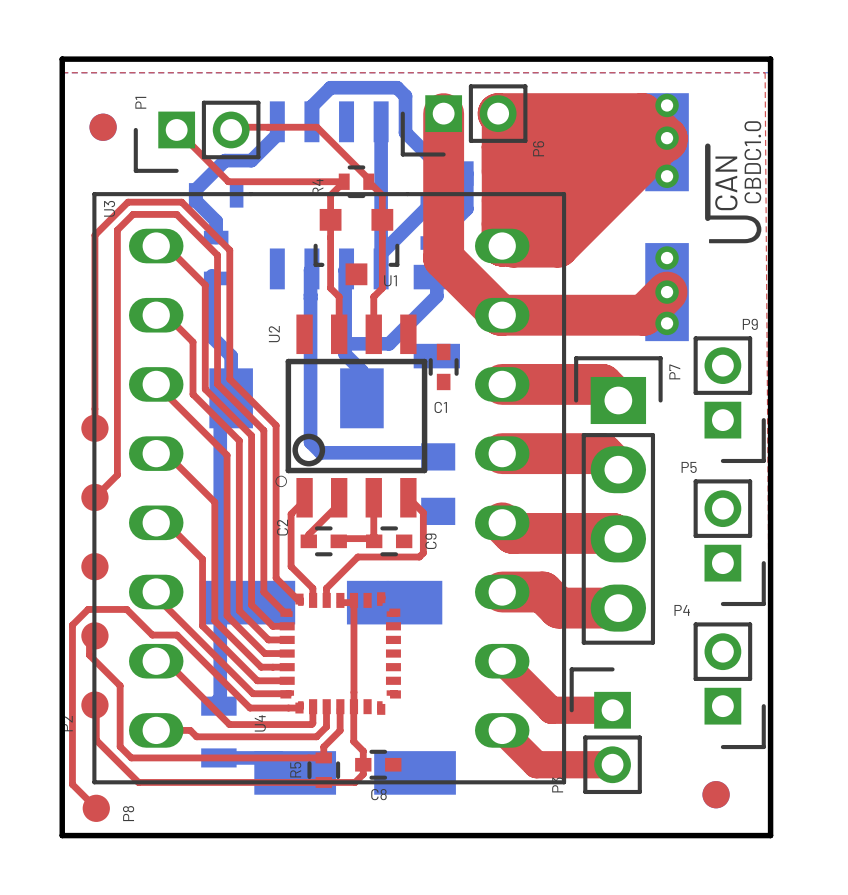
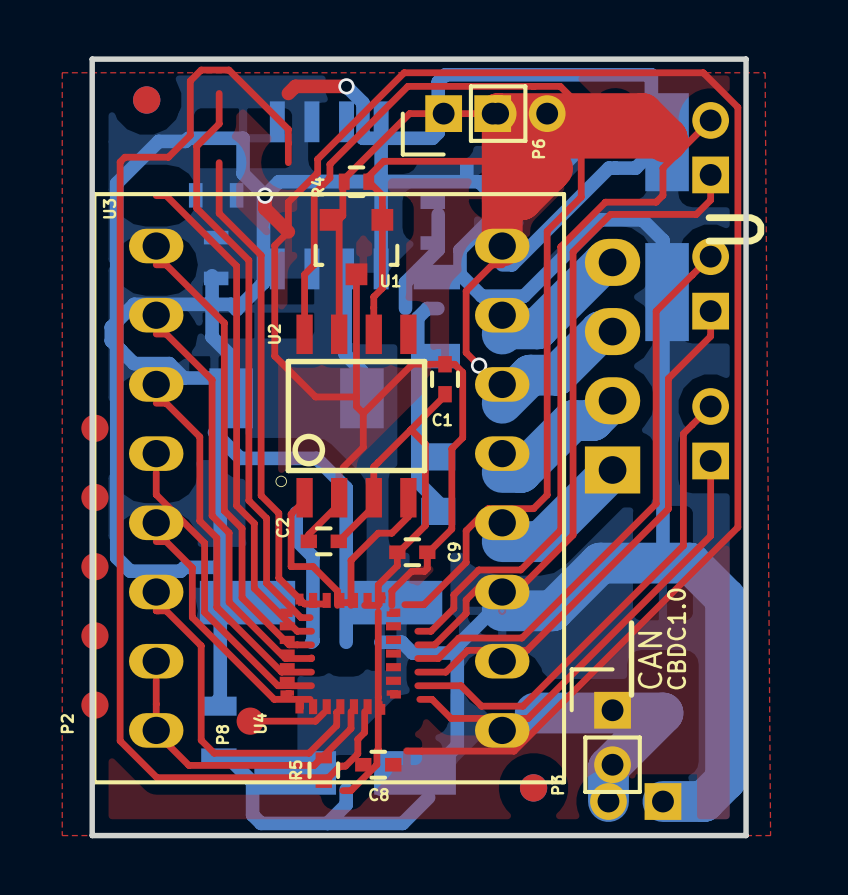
board edge: (92, 59) (62, 59) (62, 835) (92, 835) -> (92, 59) (92, 835)
board edge: (746, 59) (770, 59) (770, 835) (746, 835) -> (746, 59) (746, 835)
top track: none -> (346, 86) (295, 86) (288, 93)
bottom track: none -> (346, 86) (362, 102) (362, 138) (432, 138) (438, 132) (438, 82) (445, 74) (651, 74) (651, 152) (635, 168) (608, 168) (512, 264) (502, 264)
via: none -> (346, 86)
top track: none -> (533, 86) (407, 86) (329, 164) (329, 177) (314, 193) (314, 264) (304, 274) (304, 334)
top track: none -> (534, 86) (560, 86) (581, 107) (581, 197) (547, 231) (547, 495) (533, 508) (488, 508) (466, 530) (466, 562) (423, 604) (404, 604)
top track: none -> (219, 93) (219, 123) (196, 146) (196, 208) (248, 260) (248, 500) (266, 518) (266, 583) (300, 617) (310, 617)
via: (667, 105) -> none
top track: (443, 113) (443, 258) (500, 315) (643, 315) (667, 292) -> none
bottom track: none -> (615, 113) (533, 195) (492, 195) (479, 181) (278, 181) (263, 197) (263, 282) (236, 309) (231, 304) (134, 304) (111, 327) (111, 340) (134, 363) (169, 363) (183, 378) (214, 378)
top track: none -> (710, 120) (662, 168) (662, 195) (656, 202) (605, 202) (560, 246) (560, 529) (520, 569) (478, 569) (453, 594) (453, 608) (430, 631) (417, 631)
bottom track: (277, 121) (277, 134) (251, 160) (225, 160) (195, 189) (195, 200) (216, 221) (216, 237) -> none
bottom track: (311, 121) (311, 106) (330, 87) (397, 87) (405, 96) (405, 132) (446, 173) (466, 173) (466, 208) (432, 243) -> none
part position: (103, 127) -> (146, 100)
top track: (187, 127) (187, 140) (228, 181) (344, 181) -> (484, 105) (492, 113) (409, 113) (344, 179) (344, 181)
top track: (242, 127) (316, 127) (368, 179) -> (547, 113) (540, 106) (540, 127) (506, 161) (383, 161) (368, 176) (368, 179)
P1 side: top (197, 136) -> bottom (519, 113)
top track: (667, 138) (558, 247) (512, 246) -> none
via: (667, 138) -> none
line: (707, 146) (707, 218) -> (631, 622) (631, 695)
top track: none -> (219, 162) (219, 213) (261, 255) (261, 495) (278, 513) (278, 578) (304, 604) (323, 604)
text position: CBDC1.0 (752, 162) -> CBDC1.0 (676, 639)
top track: none -> (710, 174) (710, 200) (696, 214) (610, 214) (573, 251) (573, 535) (523, 584) (481, 584) (466, 599) (466, 613) (434, 644) (417, 644)
via: (667, 176) -> none
top track: (342, 183) (330, 195) (330, 288) (339, 296) -> (342, 183) (342, 215) (338, 219) (337, 217) (339, 218) (339, 296)
text position: CAN (726, 183) -> CAN (650, 660)
top track: none -> (156, 195) (166, 195) (236, 266) (236, 505) (254, 523) (254, 588) (297, 631) (311, 631)
top track: none -> (265, 195) (265, 208) (288, 231)
bottom track: none -> (265, 195) (243, 173) (243, 138) (188, 138) (185, 141) (158, 141) (116, 183) (116, 557) (130, 571) (180, 571) (184, 567) (221, 567)
via: none -> (265, 195)
bottom track: none -> (502, 195) (502, 207) (460, 250) (460, 274) (481, 296) (524, 296) (600, 219) (642, 219) (662, 240) (662, 563)
bottom track: (432, 202) (381, 253) -> none
bottom track: none -> (438, 214) (438, 249) (405, 282) (405, 308)
top track: none -> (288, 231) (288, 202) (317, 172) (317, 159) (404, 72) (703, 72) (737, 107) (737, 527) (514, 751) (406, 751)
top track: none -> (288, 231) (274, 245) (274, 356) (315, 396) (356, 396)
top track: (156, 246) (166, 246) (205, 285) (205, 389) (251, 435) (251, 604) (272, 626) (287, 626) -> none
top track: none -> (710, 256) (656, 311) (656, 503) (521, 638) (458, 638) (438, 658) (417, 658)
via: (667, 258) -> none
bottom track: none -> (612, 262) (604, 262) (537, 328) (507, 328) (502, 334)
top track: none -> (156, 264) (166, 264) (224, 322) (224, 510) (242, 528) (242, 597) (289, 644) (311, 644)
top track: none -> (502, 264) (492, 264) (466, 290) (466, 352) (479, 365)
bottom track: (311, 268) (310, 442) (321, 452) (436, 452) -> none
top track: none -> (356, 274) (356, 406) (363, 413)
bottom track: (436, 277) (436, 296) (389, 343) (345, 343) -> none
via: (667, 292) -> none
bottom track: none -> (437, 308) (427, 308) (417, 317) (417, 481) (439, 503)
top track: none -> (710, 311) (710, 336) (668, 378) (668, 508) (526, 650) (467, 650) (445, 672) (417, 672)
top track: (156, 315) (166, 315) (193, 342) (193, 394) (239, 440) (239, 610) (268, 639) (287, 639) -> none
via: (667, 323) -> none
bottom track: none -> (612, 331) (600, 331) (556, 375) (530, 375) (502, 403)
top track: none -> (156, 334) (166, 334) (212, 379) (212, 515) (229, 532) (229, 602) (285, 658) (311, 657)
via: none -> (479, 365)
C1 position: (443, 366) -> (445, 379)
top track: (156, 384) (227, 455) (227, 615) (264, 653) (287, 653) -> none
top track: (502, 384) (602, 384) (618, 400) -> none
top track: none -> (445, 395) (373, 466) (373, 486)
P9 side: top (729, 399) -> bottom (710, 147)
bottom track: none -> (612, 400) (592, 420) (572, 420) (520, 472) (502, 472)
top track: none -> (156, 403) (166, 403) (199, 436) (199, 520) (216, 537) (216, 607) (281, 672) (311, 672)
top track: none -> (710, 406) (683, 433) (683, 545) (523, 706) (481, 706) (461, 685) (417, 685)
top track: none -> (363, 413) (412, 364) (454, 364) (462, 372) (462, 437) (451, 448) (451, 529) (427, 552) (427, 568) (424, 571) (411, 571) (391, 591) (391, 605)
top track: none -> (363, 413) (363, 447) (343, 467)
top track: (94, 428) (94, 235) (128, 202) (181, 202) (229, 250) (229, 379) (276, 425) (276, 578) (299, 601) -> none
top track: none -> (410, 429) (425, 444) (425, 525) (397, 552) (397, 565) (378, 584) (378, 605) (364, 605)
bottom track: none -> (214, 432) (240, 458) (316, 458) (346, 487) (346, 642)
top track: (156, 453) (166, 453) (214, 502) (214, 620) (261, 667) (287, 667) -> none
top track: (502, 453) (602, 453) (618, 469) -> none
top track: none -> (710, 460) (710, 535) (528, 718) (451, 718) (432, 699) (419, 699)
bottom track: none -> (612, 469) (540, 541) (502, 541)
top track: none -> (156, 472) (156, 494) (204, 543) (204, 612) (277, 685) (311, 685)
top track: (94, 497) (117, 475) (117, 230) (133, 214) (176, 214) (217, 255) (217, 384) (263, 430) (263, 592) (285, 612) -> none
top track: (408, 497) (423, 512) (423, 553) (419, 557) (357, 557) (326, 588) (326, 602) -> (408, 497) (408, 516) (391, 533) (378, 533) (351, 560) (351, 605)
P7 side: top (618, 500) -> bottom (612, 366)
top track: (373, 506) (373, 535) (376, 538) (341, 538) -> (373, 506) (338, 541)
bottom track: none -> (296, 512) (296, 540) (312, 556) (311, 642)
top track: (156, 522) (166, 522) (202, 559) (202, 625) (257, 680) (287, 680) -> none
top track: (502, 522) (512, 533) (612, 533) (618, 538) -> none
top track: none -> (156, 541) (166, 541) (192, 567) (192, 617) (274, 699) (310, 699)
C9 position: (389, 541) -> (412, 552)
P5 side: top (729, 542) -> bottom (710, 283)
top track: (291, 566) (312, 588) (312, 602) -> (291, 566) (312, 566) (337, 591) (337, 605)
top track: (502, 592) (542, 592) (558, 608) (618, 608) -> none
top track: (156, 596) (253, 693) (289, 693) -> none
top track: (353, 600) (353, 706) -> none
top track: none -> (156, 610) (166, 610) (201, 645) (201, 740) (214, 753) (309, 753) (336, 725) (337, 711)
top track: none -> (378, 612) (376, 764) (351, 790) (342, 790)
top track: (89, 635) (89, 655) (120, 685) -> (288, 162) (288, 129) (229, 70) (201, 70) (190, 80) (190, 135) (168, 157) (124, 157) (120, 161) (120, 685)
bottom track: none -> (380, 642) (401, 642) (412, 653) (457, 653)
top track: (156, 661) (166, 661) (229, 724) (311, 724) (312, 708) -> none
top track: (502, 661) (551, 710) (612, 710) -> none
top track: none -> (156, 680) (156, 732) (188, 765) (314, 765) (351, 728) (351, 711)
P4 side: top (729, 685) -> bottom (710, 433)
top track: (89, 705) (96, 711) (96, 740) (138, 782) (355, 782) (363, 774) (363, 751) (353, 741) (353, 708) -> none
top track: (299, 708) (249, 708) (177, 635) (152, 635) (126, 609) (88, 609) (72, 625) (72, 784) (96, 808) -> none
top track: (326, 708) (326, 726) (316, 736) (196, 736) (190, 730) (156, 730) -> none
top track: (340, 708) (340, 730) (323, 746) (323, 757) (131, 757) (120, 746) (120, 740) -> (364, 711) (364, 732) (357, 739) (357, 753) (345, 766) (340, 766) (328, 777) (156, 777) (120, 740)
top track: none -> (323, 712) (315, 721) (250, 721)
bottom track: none -> (535, 713) (662, 713) (608, 767) (608, 801)
top track: (502, 730) (536, 764) (612, 764) -> none
bottom track: none -> (421, 755) (447, 755) (457, 745) (457, 645) (492, 610) (552, 610) (600, 563) (690, 563) (725, 598) (725, 779) (703, 801) (662, 801)
bottom track: none -> (233, 763) (252, 781) (252, 814) (261, 823) (402, 823) (428, 797)
bottom track: none -> (346, 789) (346, 804) (327, 823)
part position: (716, 794) -> (533, 787)
part: none -> (635, 801)
P8 position: (96, 808) -> (250, 721)
P8 name position: P8 (128, 813) -> P8 (222, 734)

